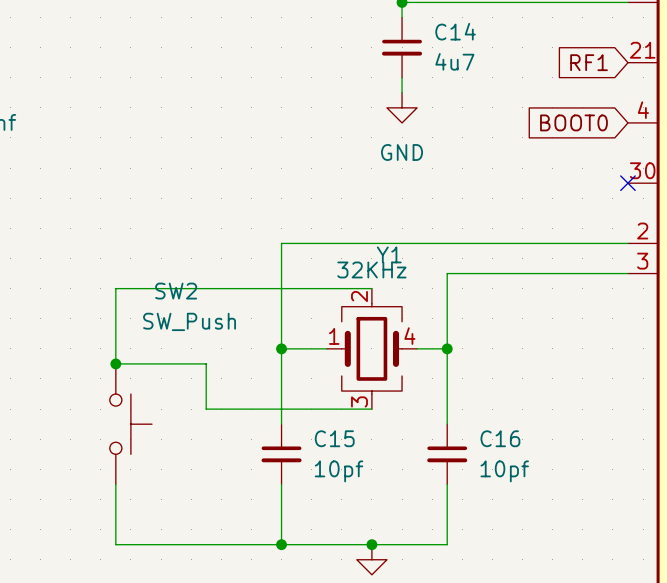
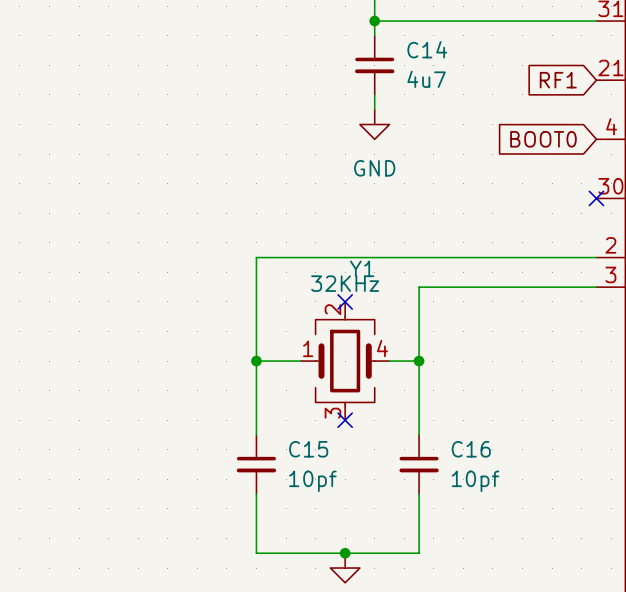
wire: (371, 288) (115, 288) (115, 363) (206, 363) (206, 409) (371, 409) -> none
no-connect mark: none -> (345, 301)
junction: (115, 363) -> none
no-connect mark: none -> (345, 420)
SW2: SW_Push (130, 424) -> none
wire: (115, 484) (115, 544) (281, 544) -> none
junction: (281, 544) -> none

